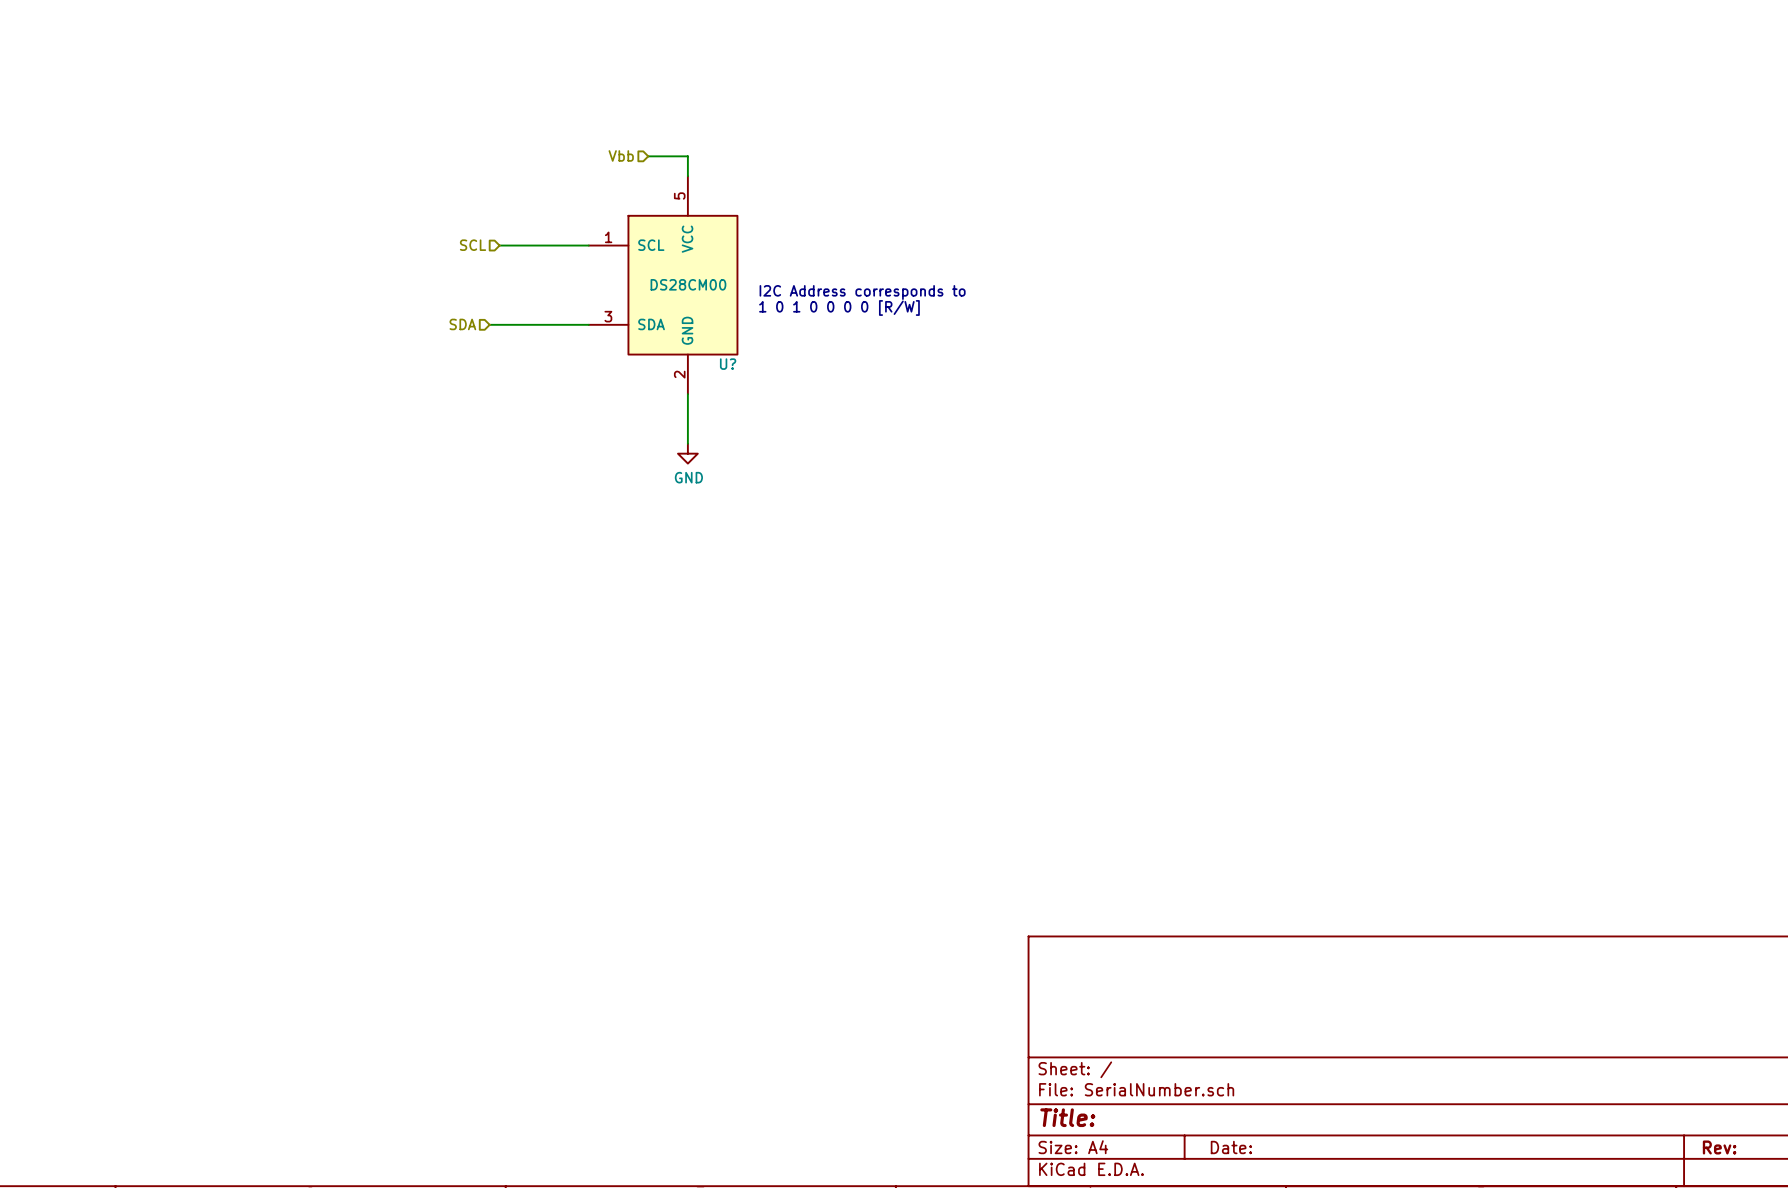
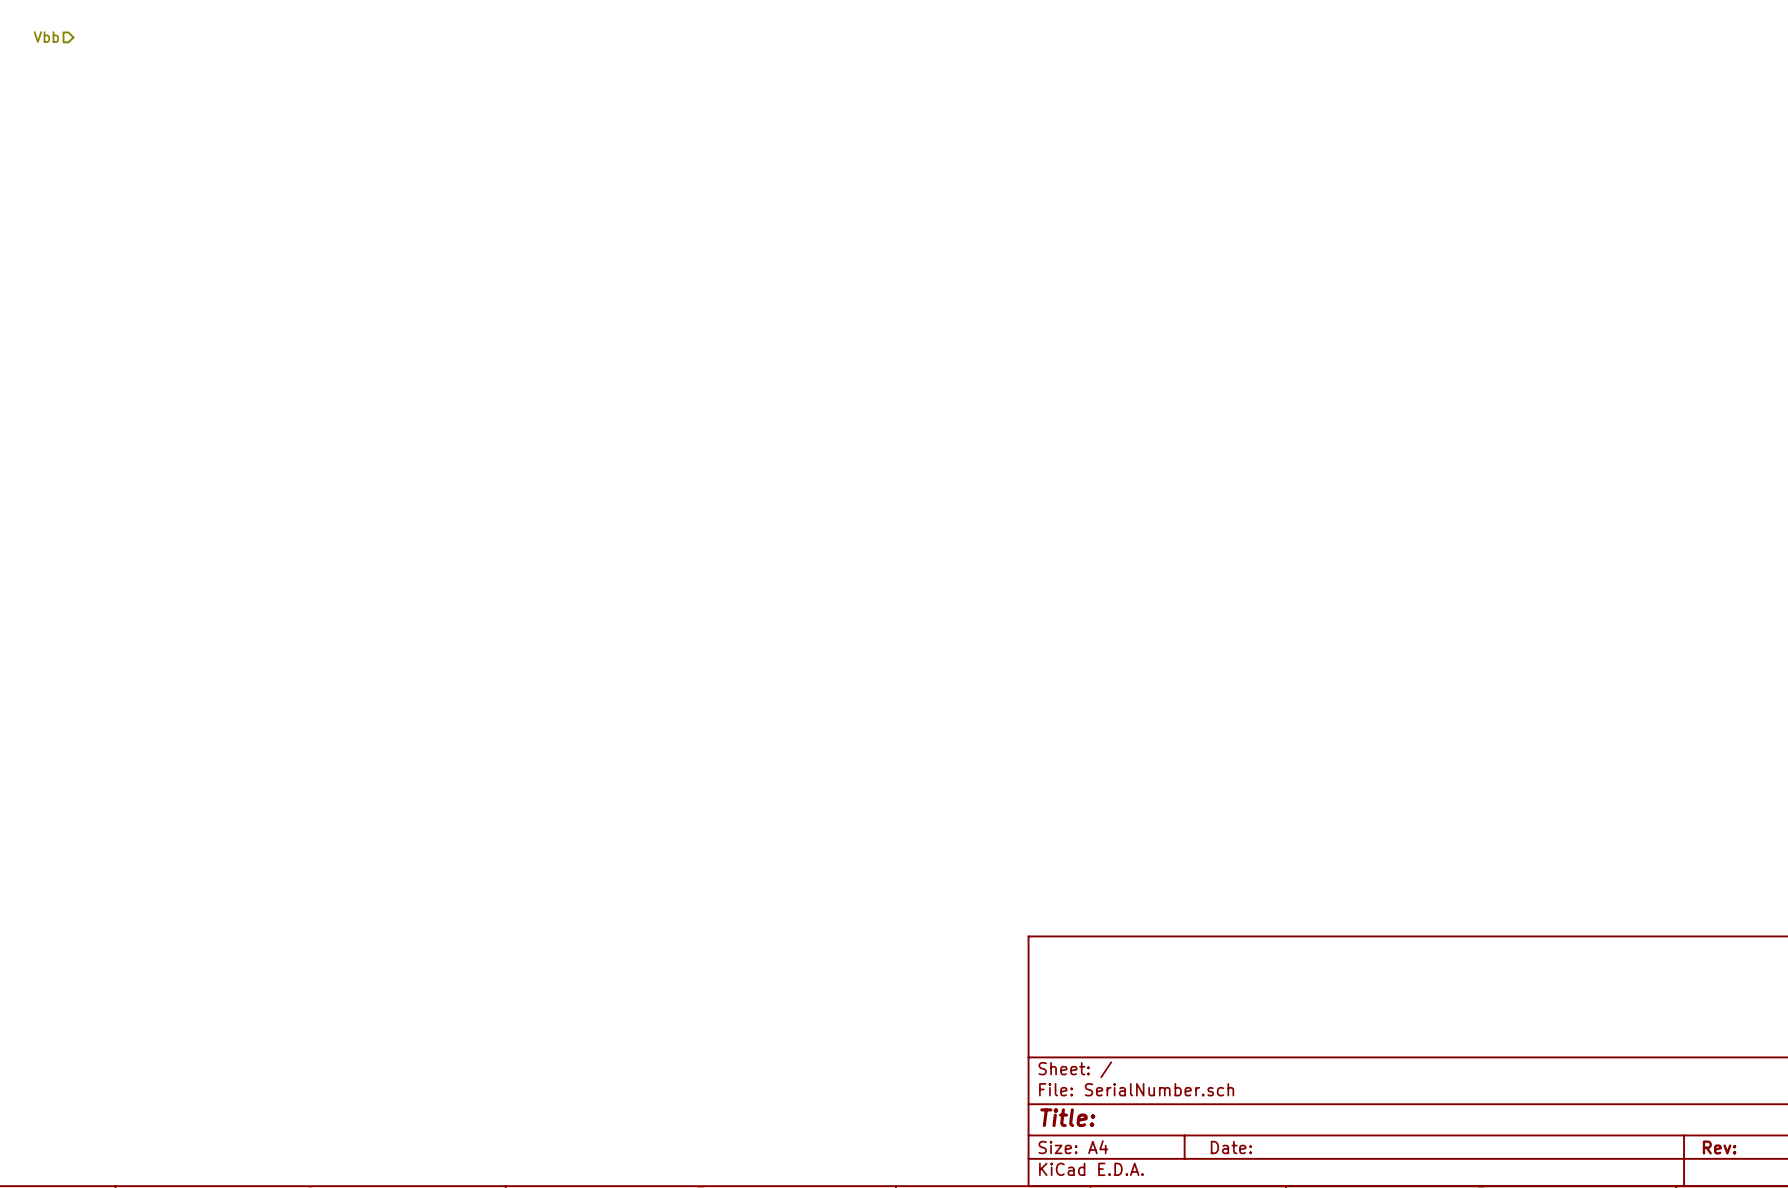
hierarchical label: none -> Vbb (46, 37)
hierarchical label: Vbb (621, 155) -> none
wire: (648, 156) (687, 156) (687, 176) -> none
hierarchical label: SCL (473, 245) -> none
wire: (499, 245) (588, 245) -> none
U?: DS28CM00 (663, 285) -> none
text: I2C Address corresponds to (862, 292) -> none
text: 1 0 1 0 0 0 0 [R/W] (839, 307) -> none
hierarchical label: SDA (462, 324) -> none
wire: (489, 324) (588, 324) -> none
wire: (687, 394) (687, 443) -> none
power symbol: GND (687, 453) -> none

